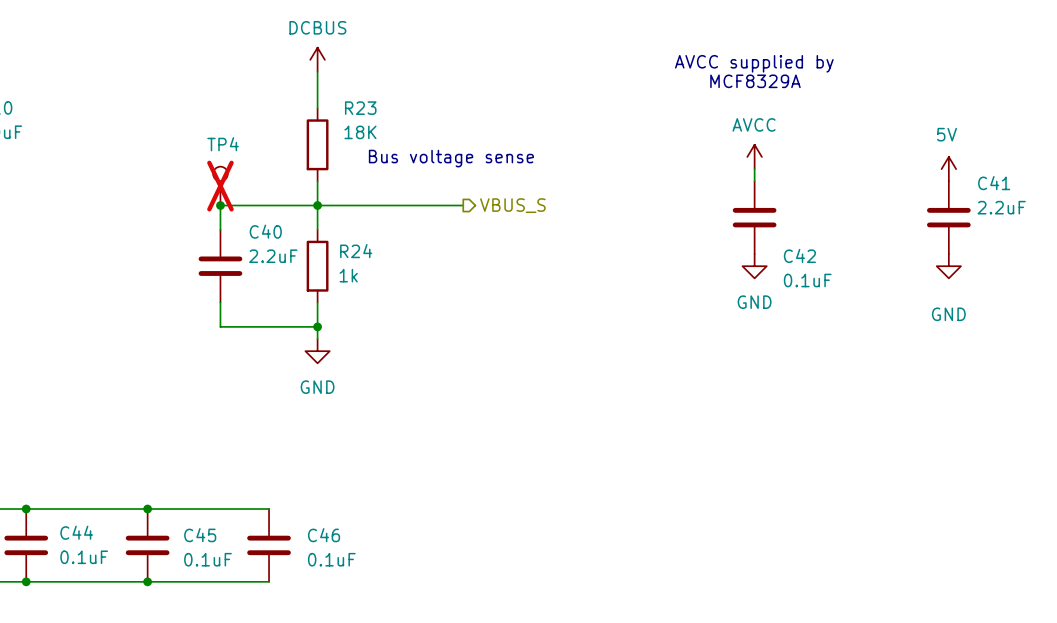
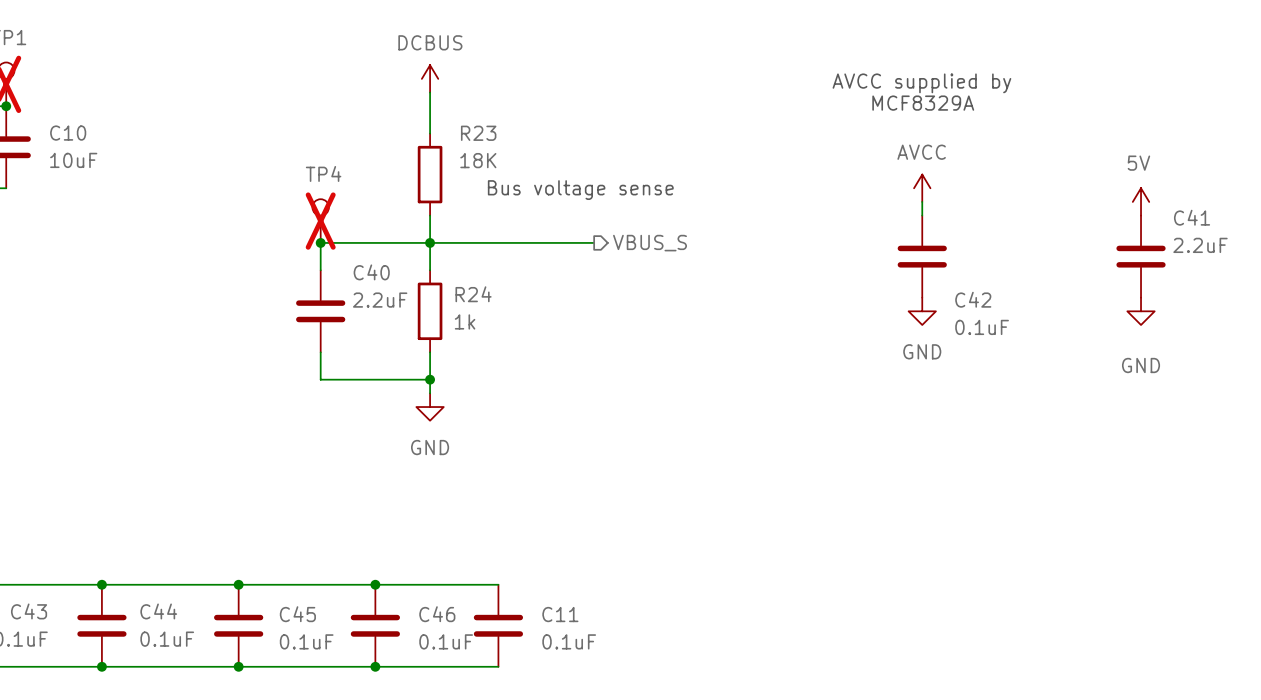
wire: none -> (375, 584) (498, 584)
junction: none -> (375, 584)
C11: none -> 0.1uF (498, 625)
wire: none -> (375, 666) (498, 666)
junction: none -> (375, 666)

